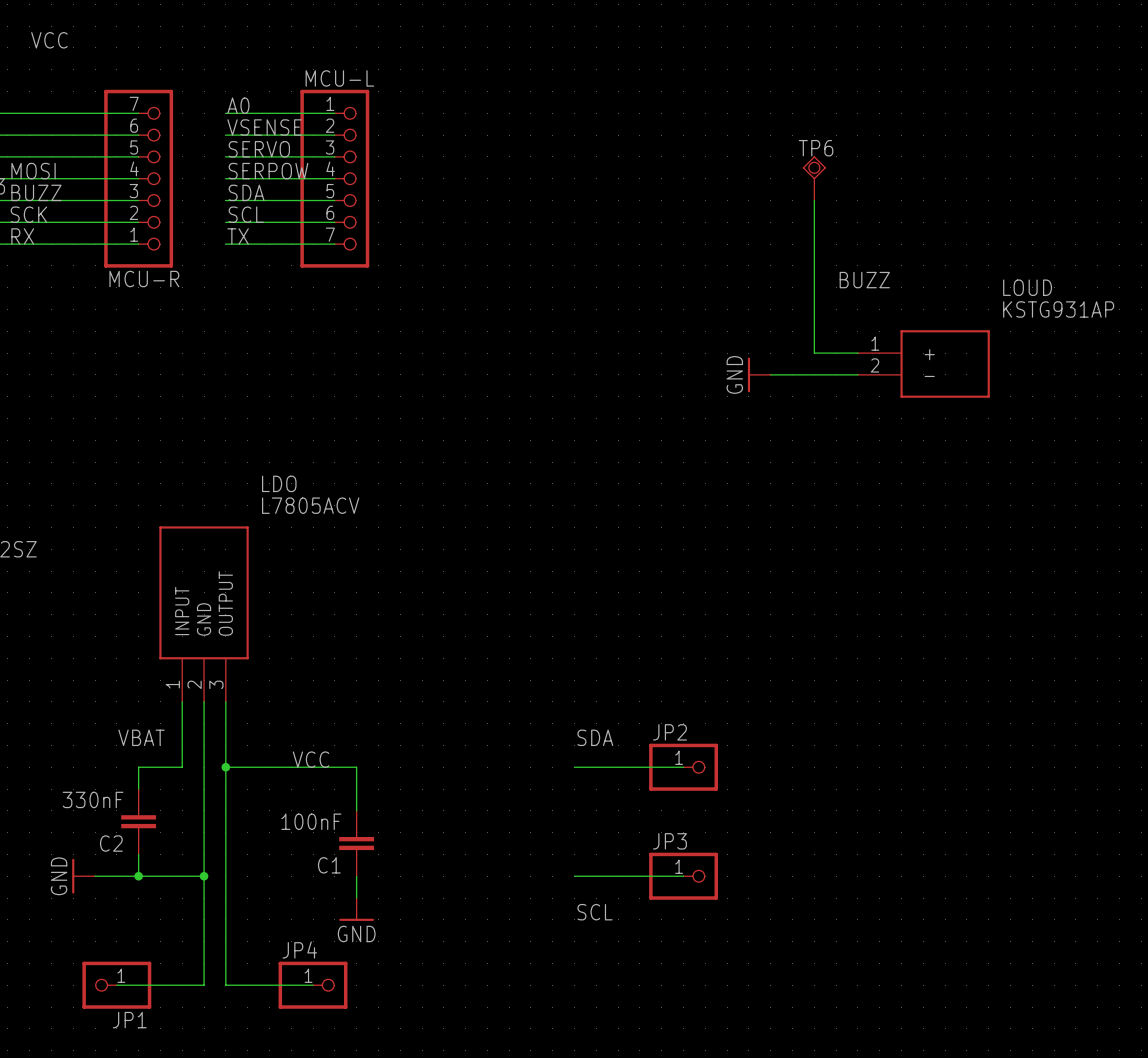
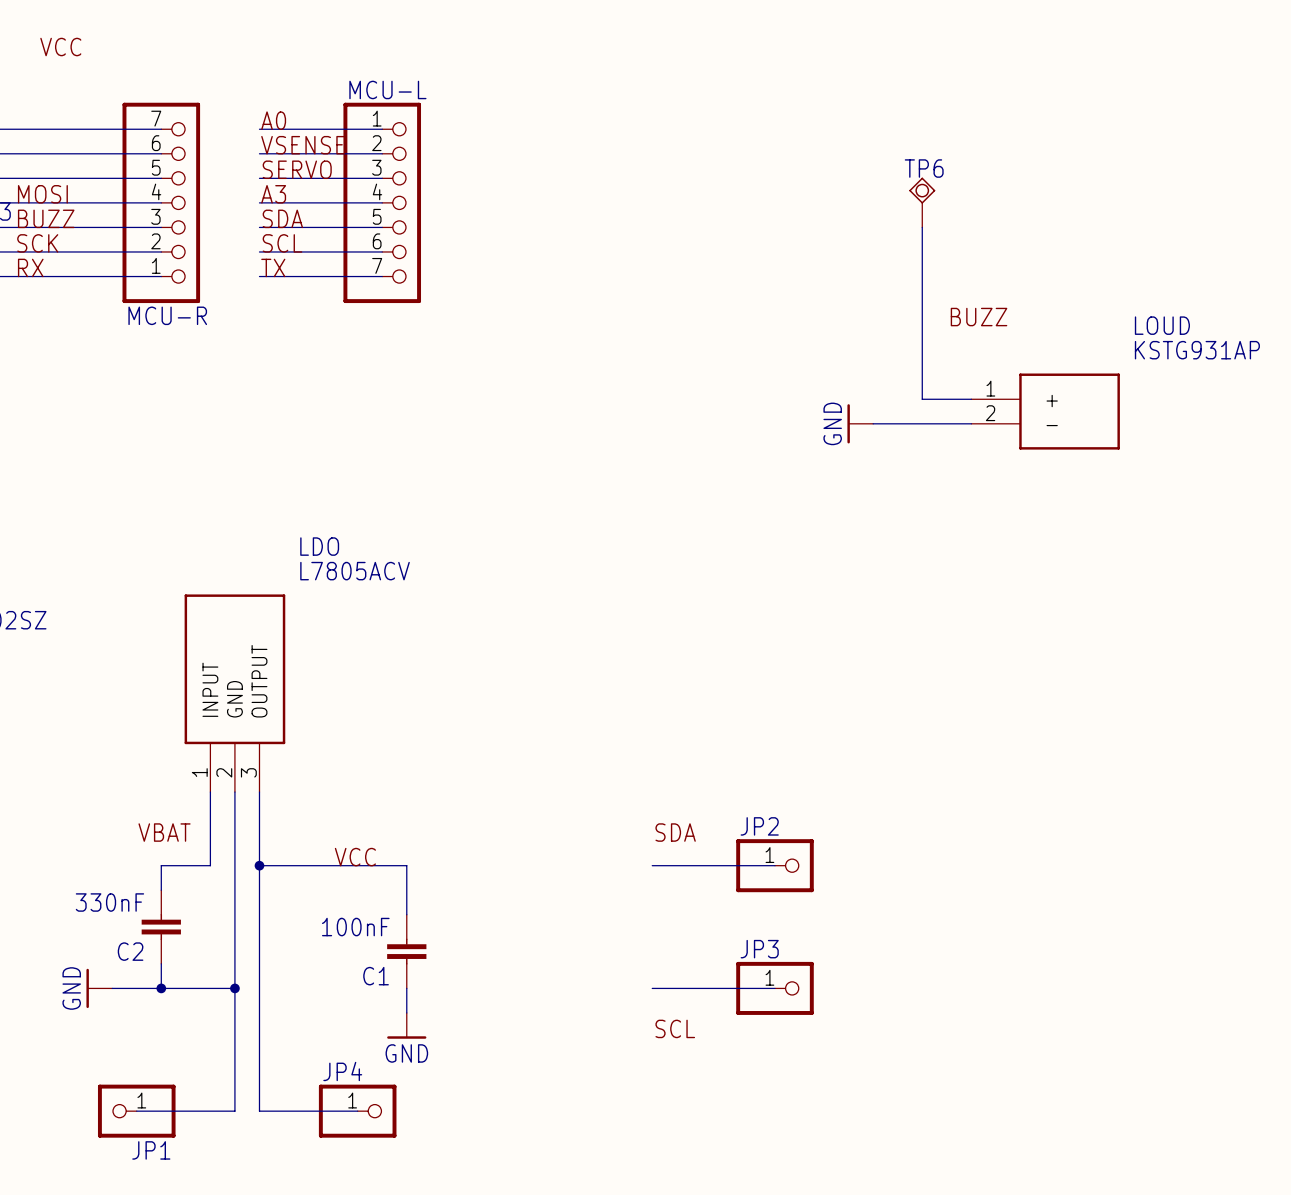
label: SERPOW (268, 171) -> A3 (273, 194)

